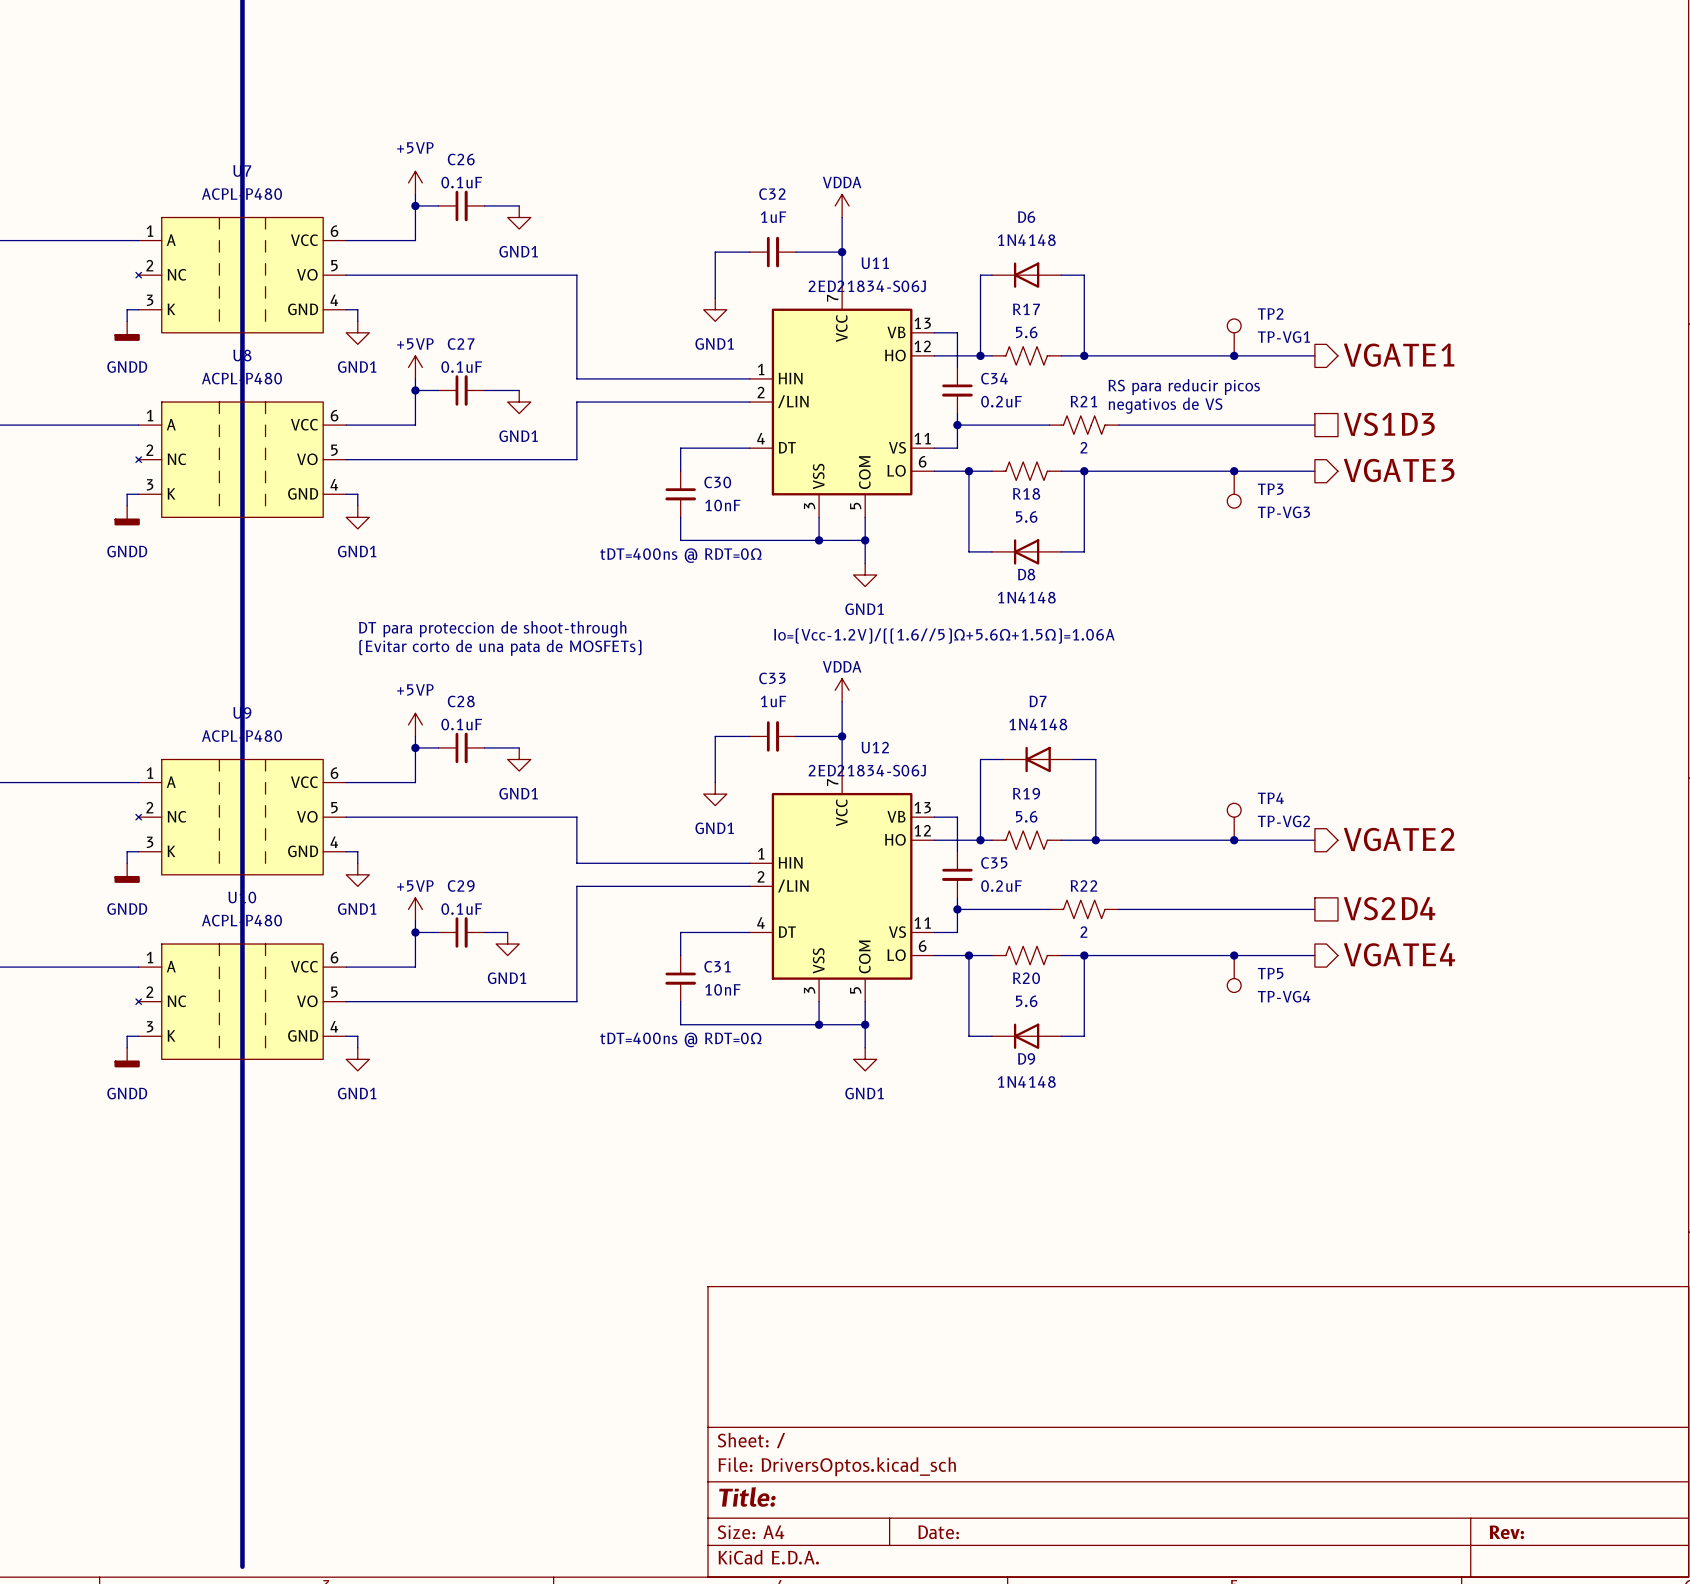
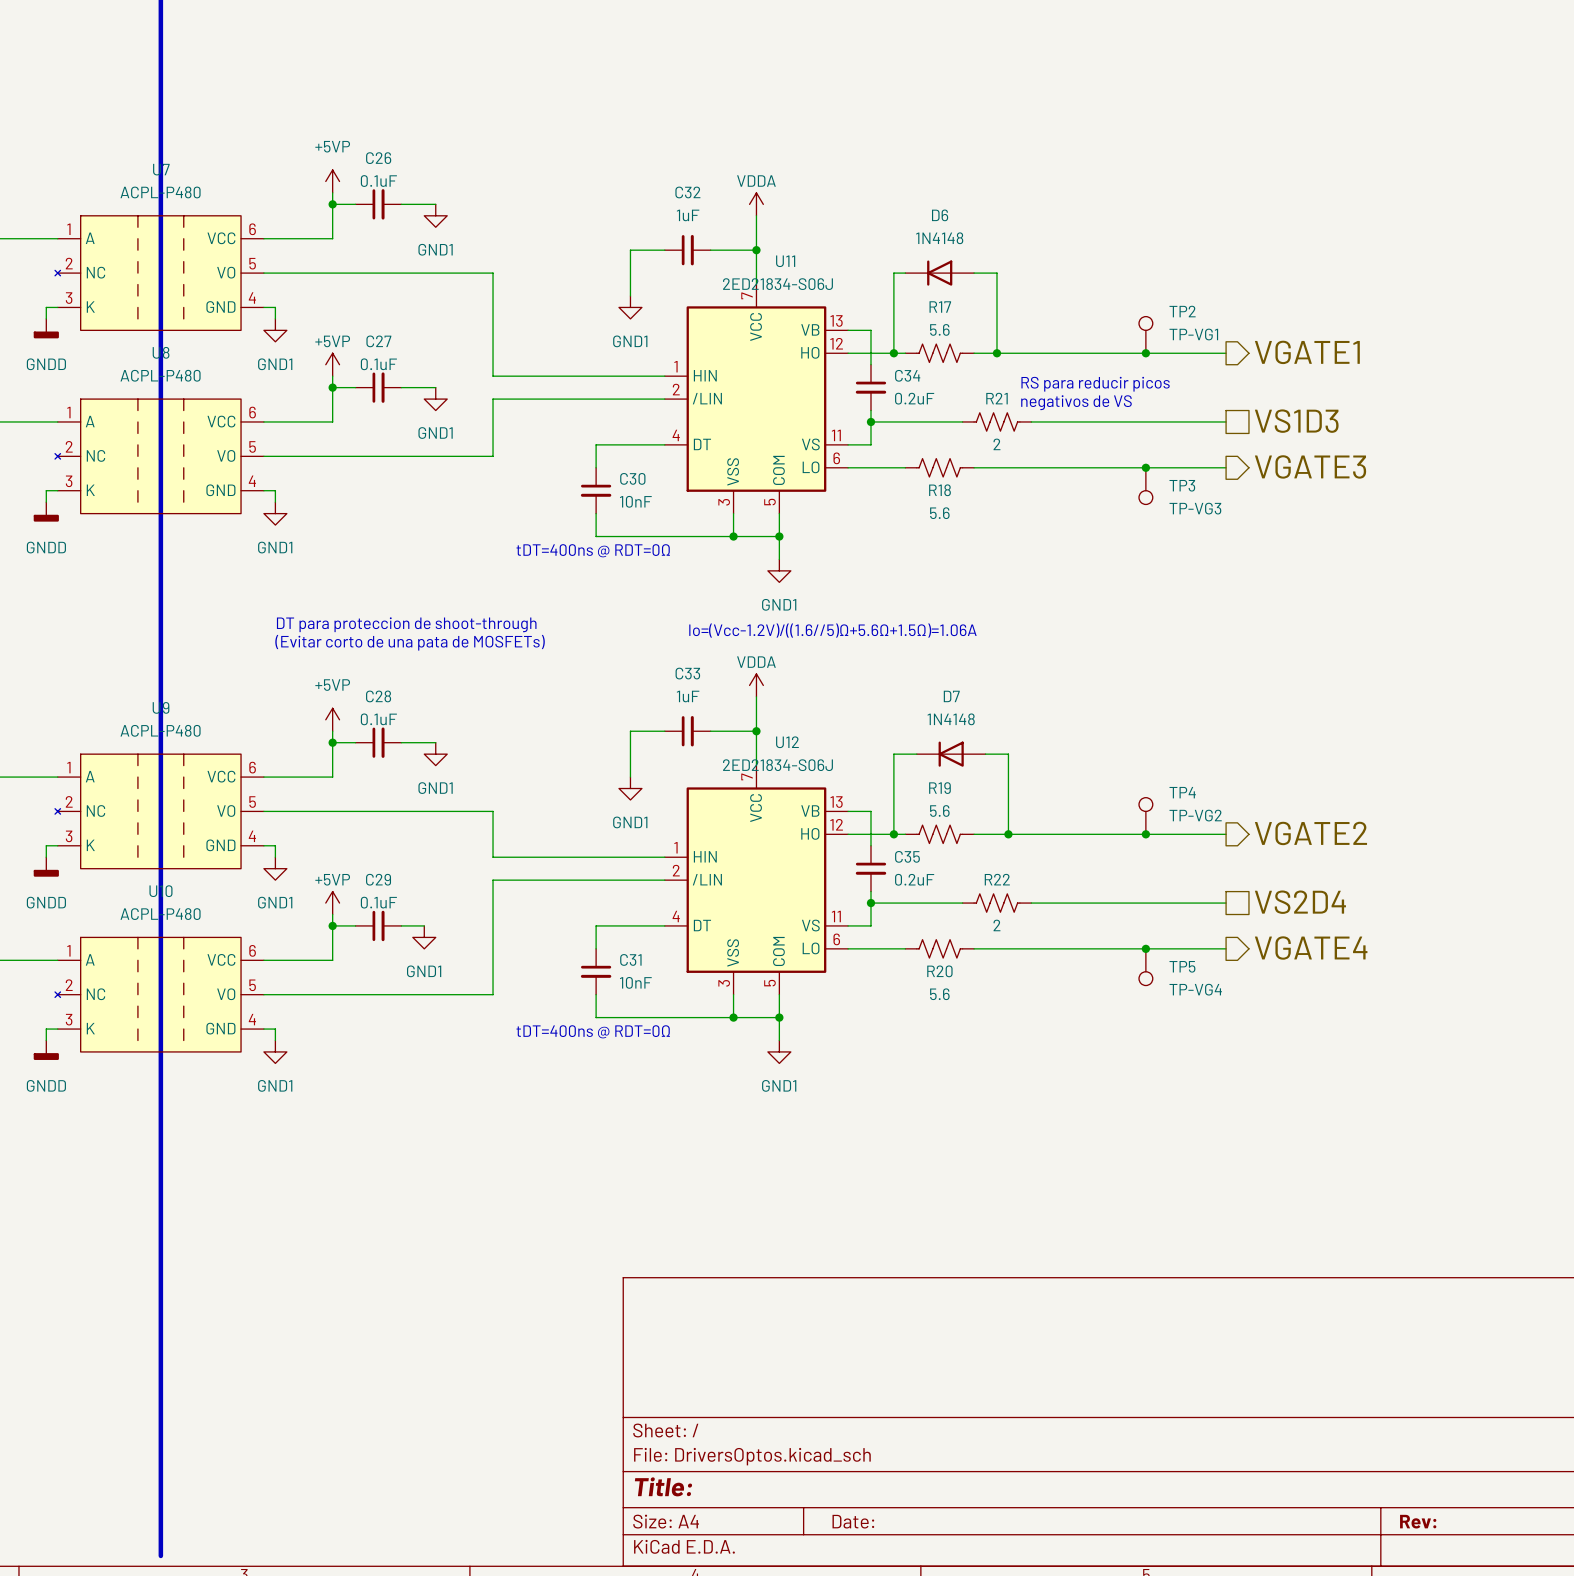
wire: (968, 471) (968, 551) (992, 551) -> none
junction: (968, 471) -> none
wire: (1084, 471) (1084, 551) (1061, 551) -> none
junction: (1084, 471) -> none
D8: 1N4148 (1026, 551) -> none
wire: (968, 955) (968, 1036) (992, 1036) -> none
junction: (968, 955) -> none
wire: (1084, 955) (1084, 1036) (1061, 1036) -> none
junction: (1084, 955) -> none
D9: 1N4148 (1026, 1036) -> none

